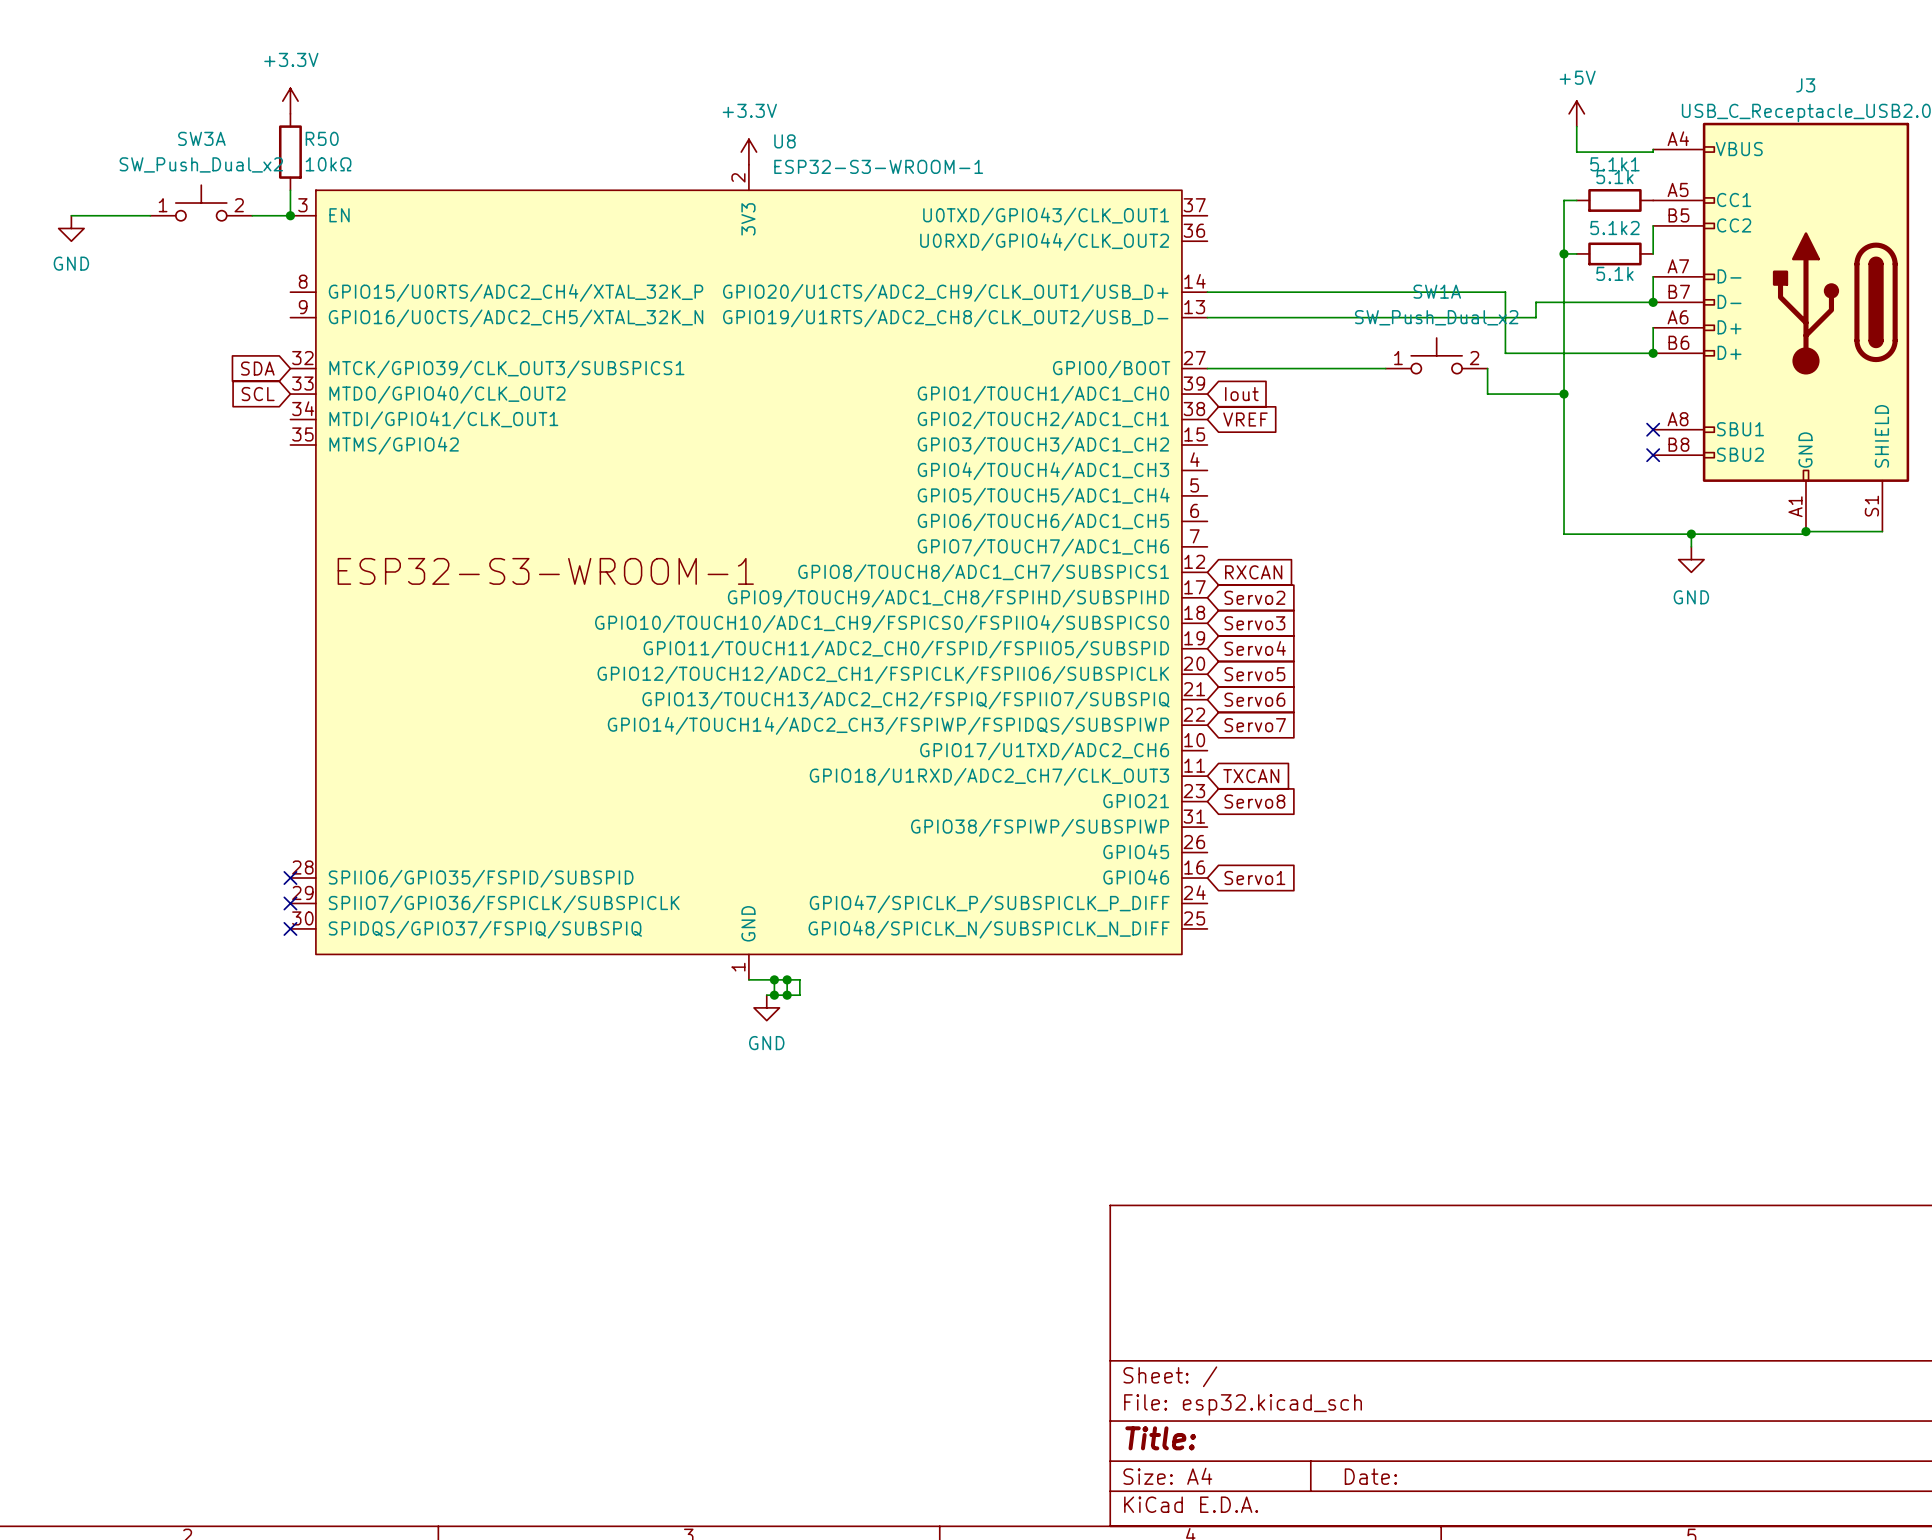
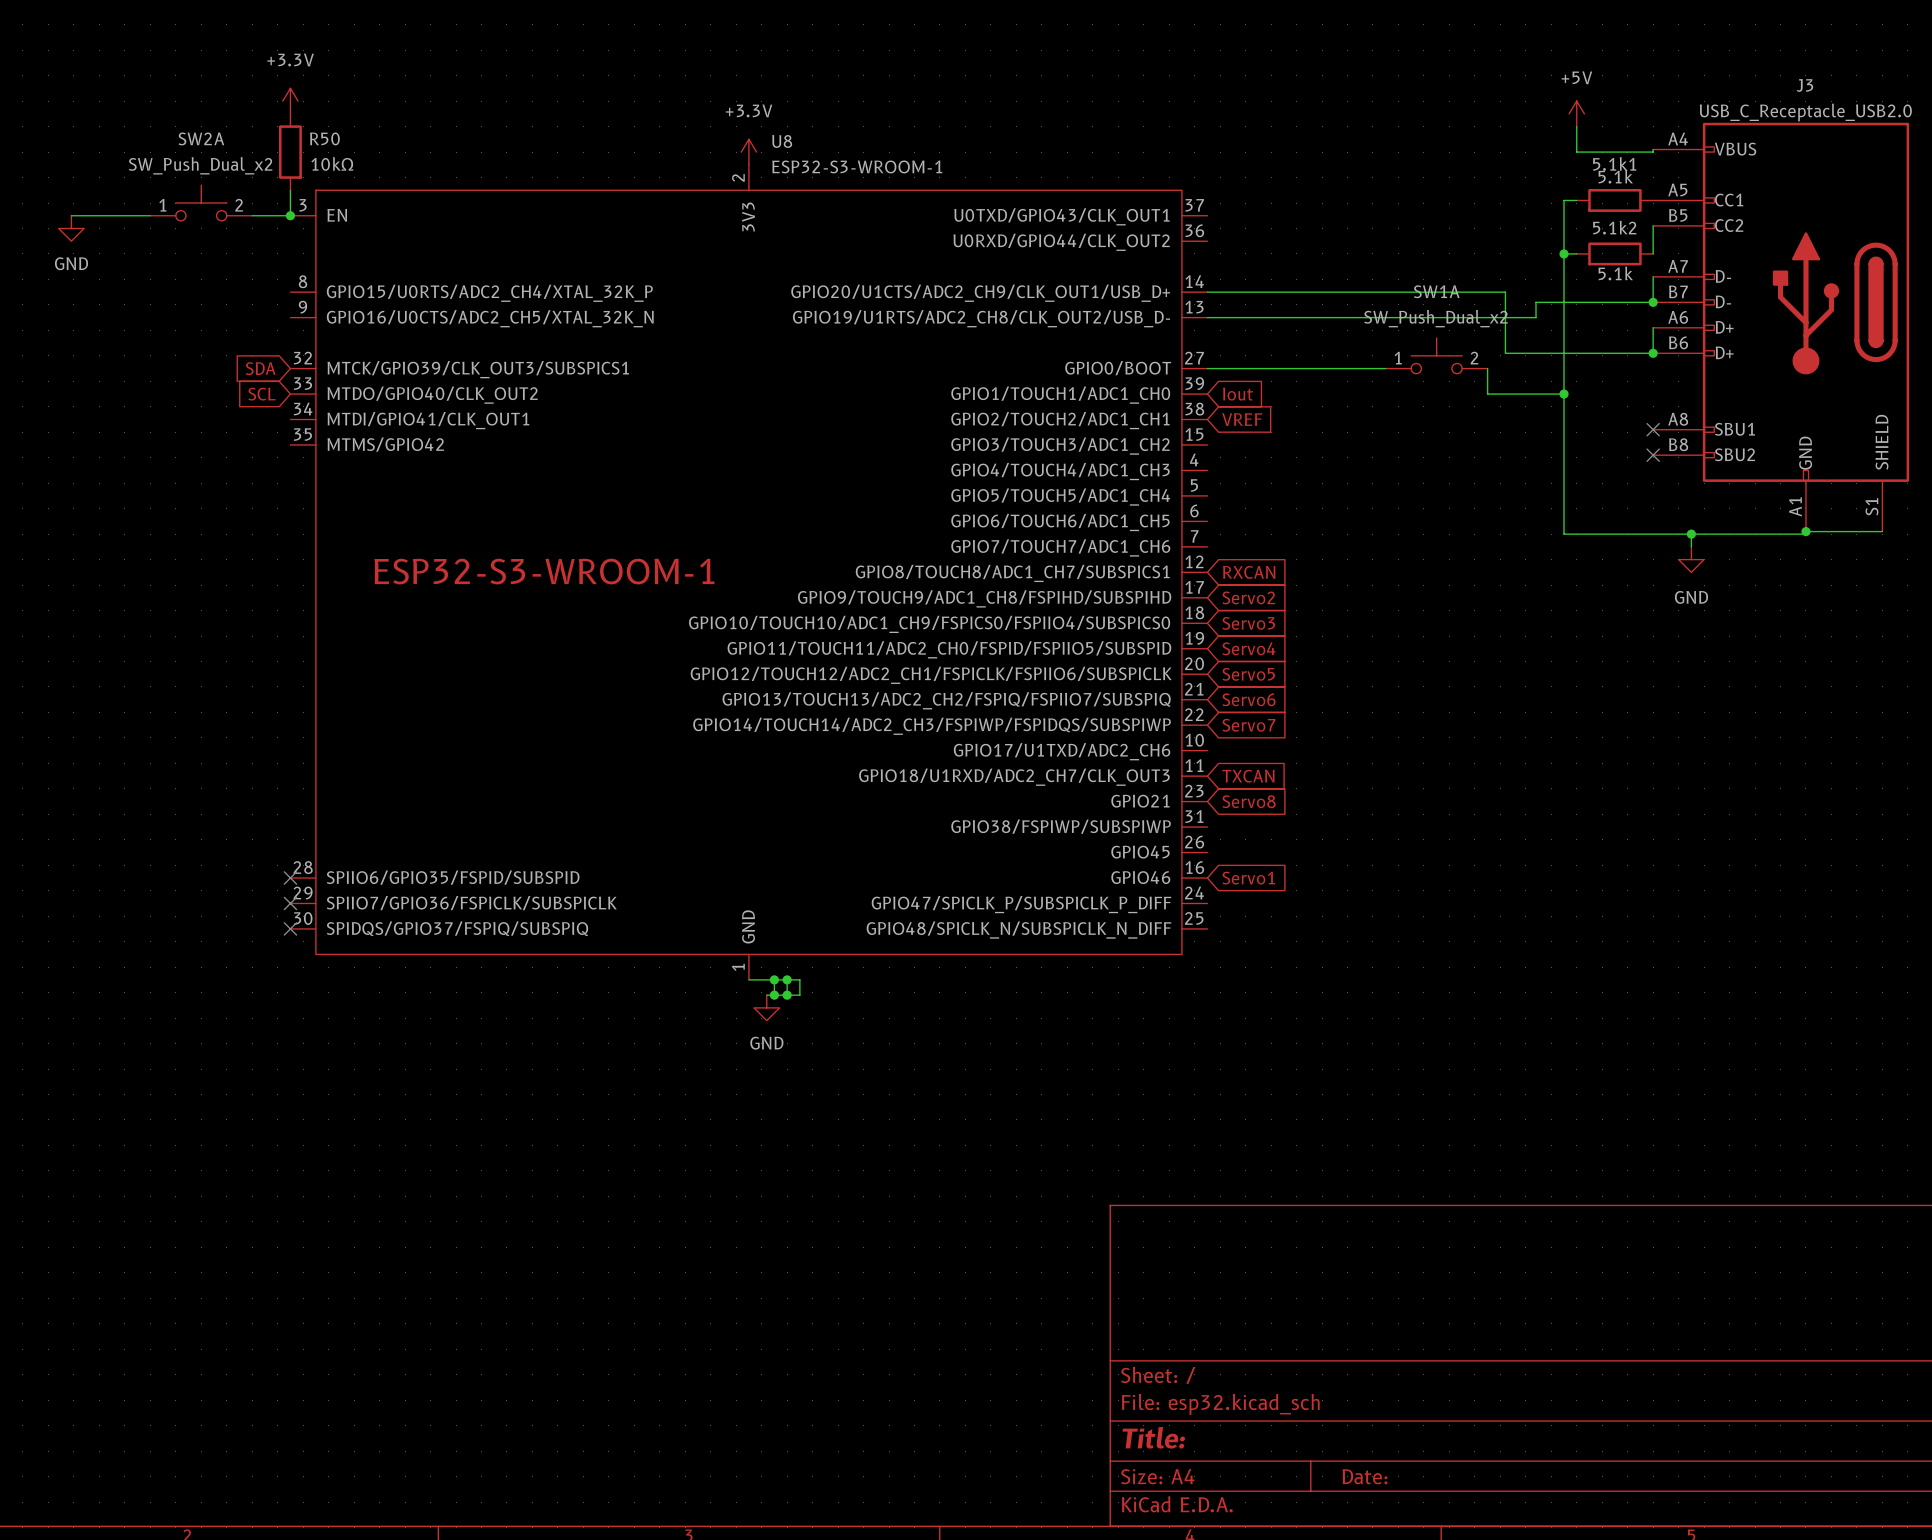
SW3A name: SW3A (201, 138) -> SW2A (201, 138)

